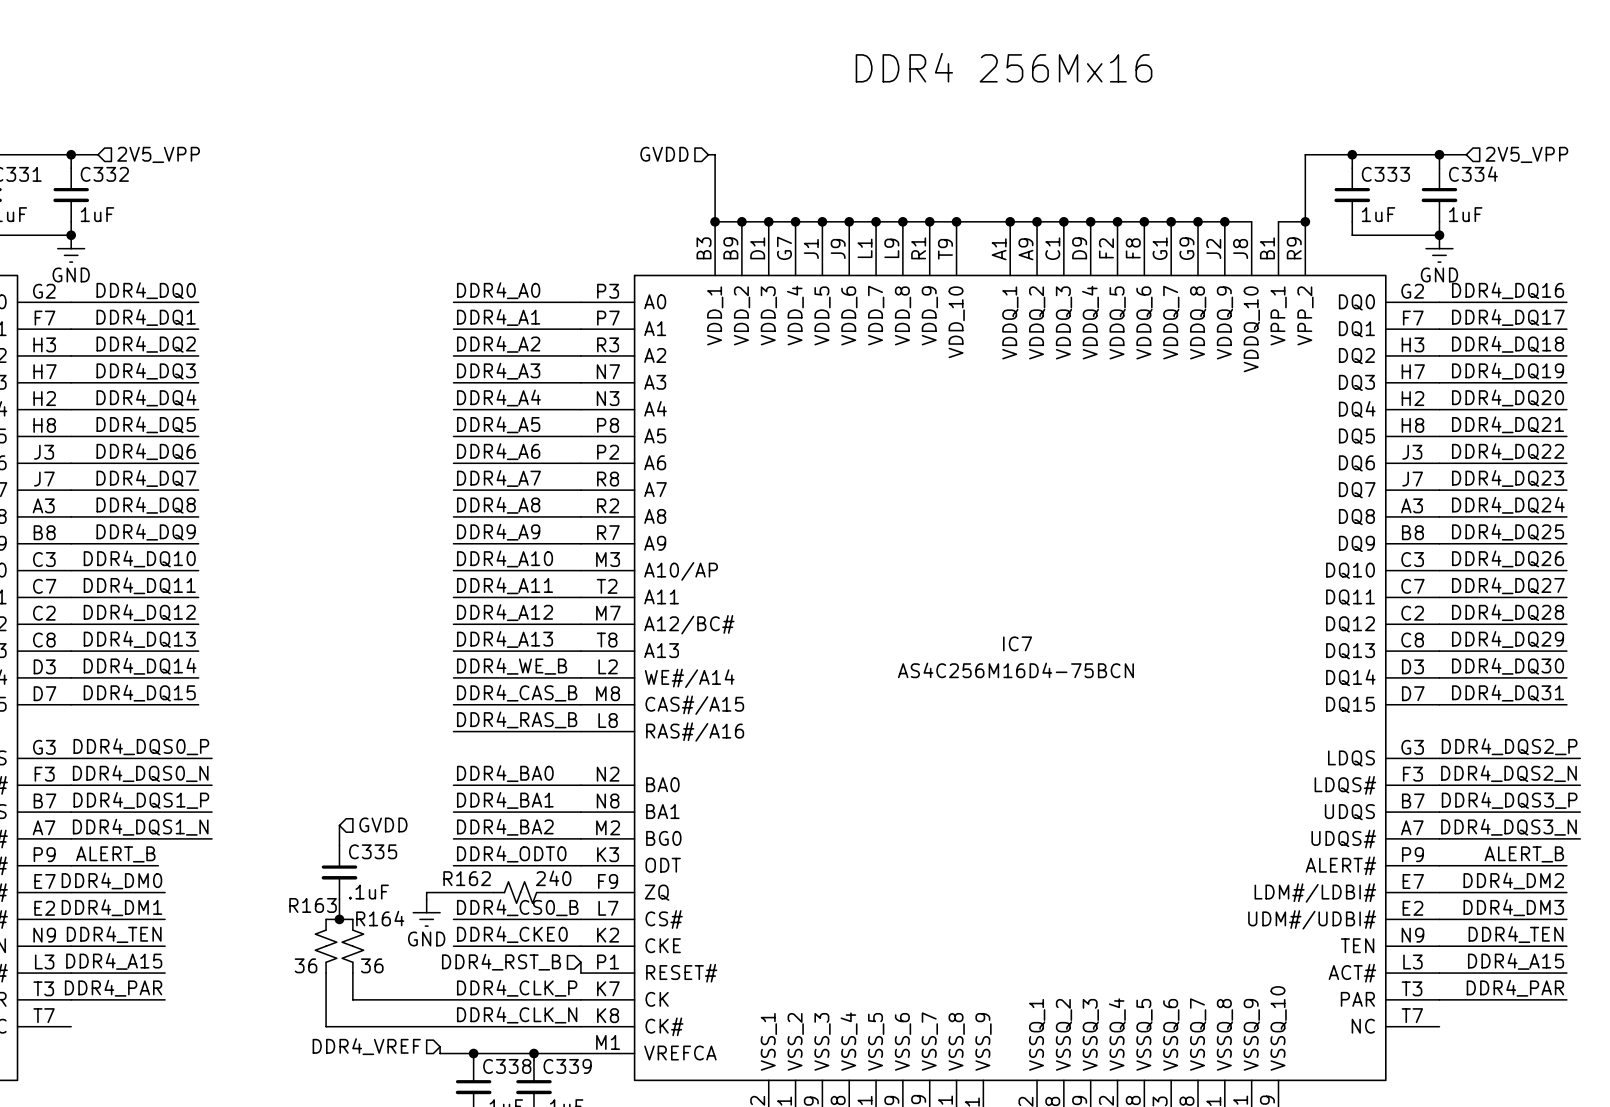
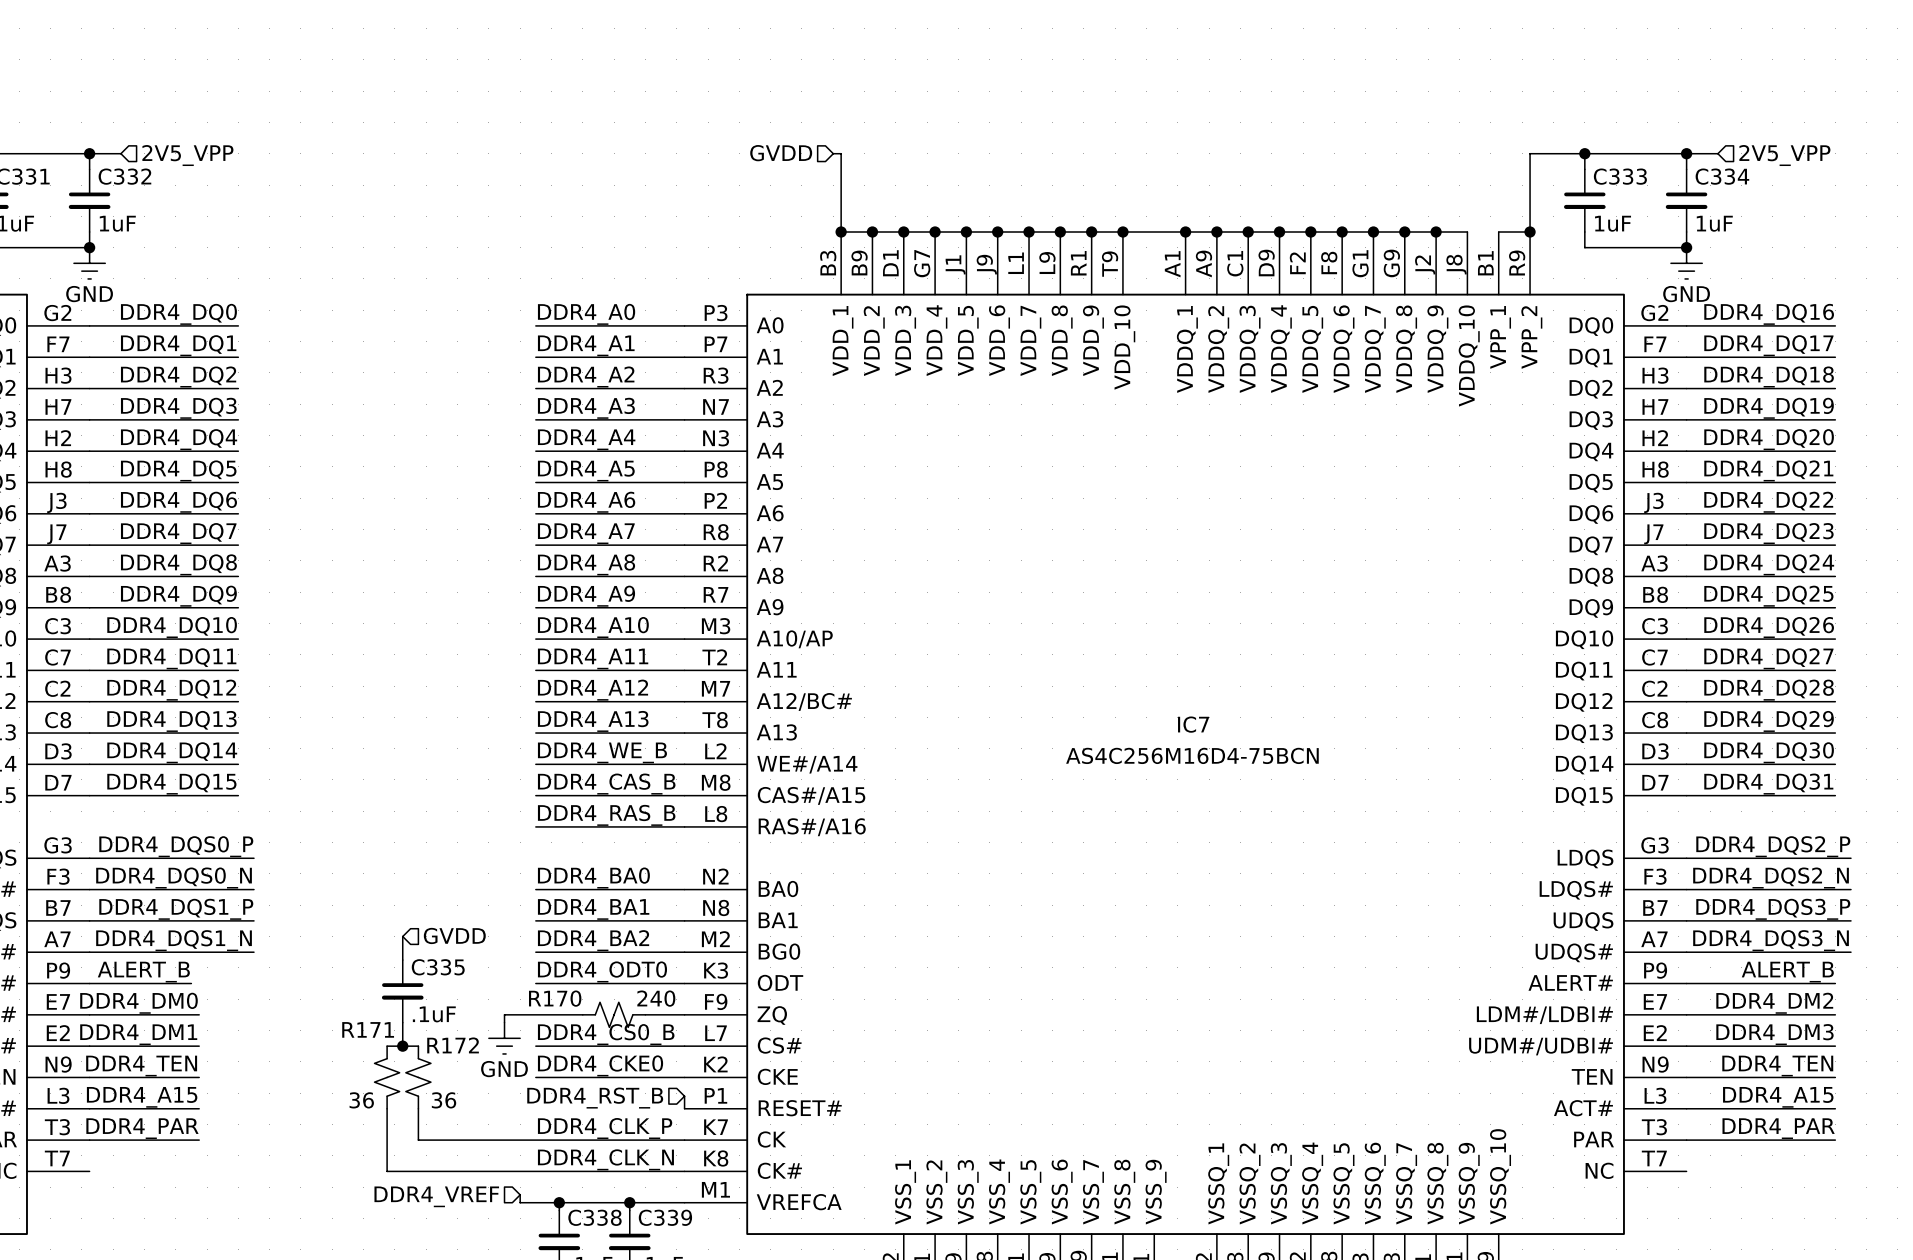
text: DDR4 256Mx16 (1004, 67) -> none
R162 name: R162 (467, 878) -> R170 (555, 998)
R163 name: R163 (313, 905) -> R171 (368, 1029)
R164 name: R164 (380, 918) -> R172 (453, 1045)

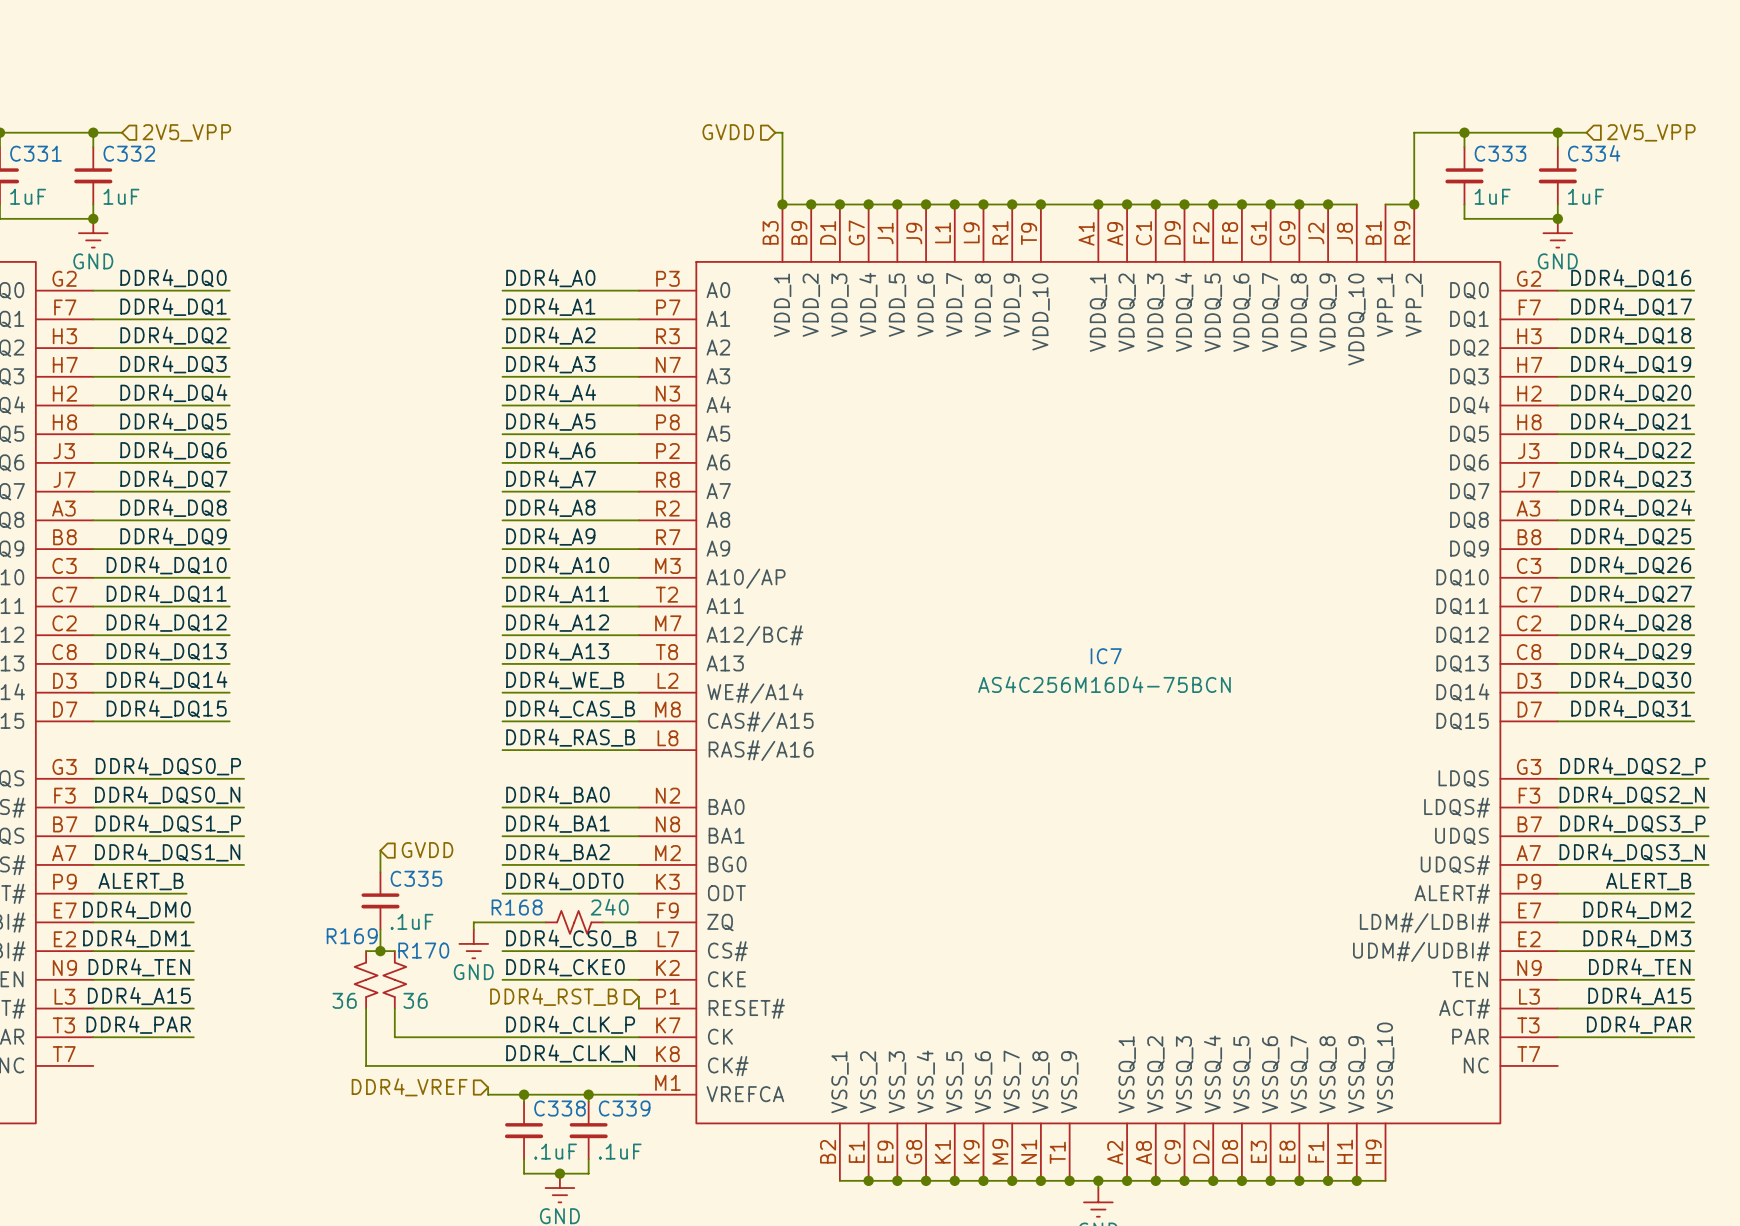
R170 name: R170 (555, 998) -> R168 (517, 907)
R171 name: R171 (368, 1029) -> R169 (352, 936)
R172 name: R172 (453, 1045) -> R170 (423, 950)

